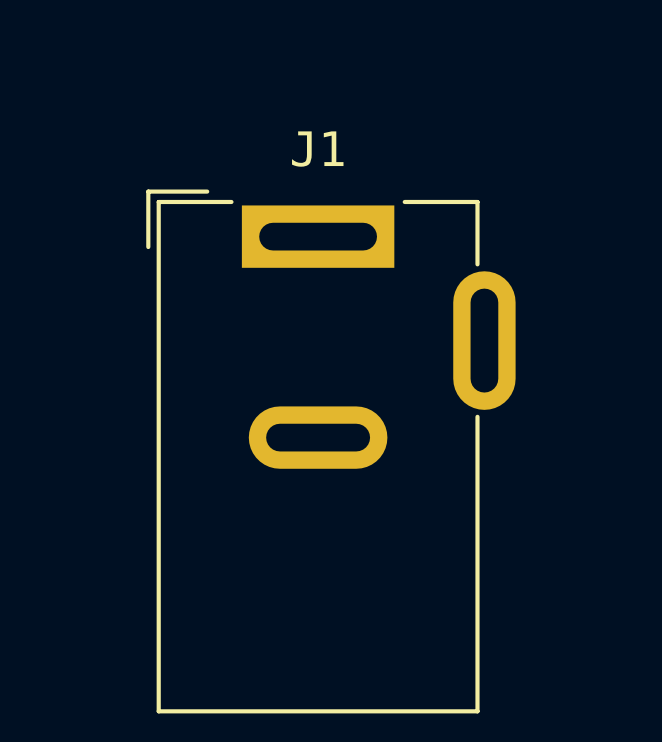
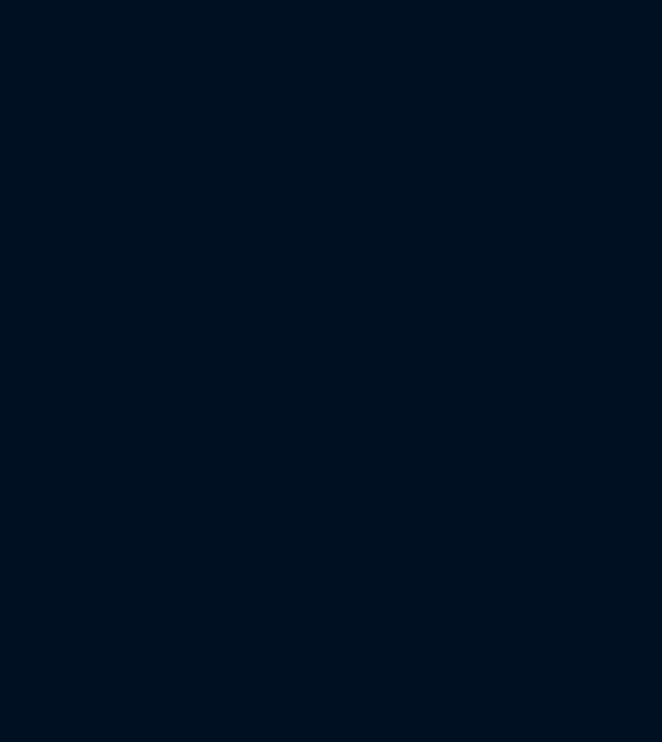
J1: (330, 451) -> none

